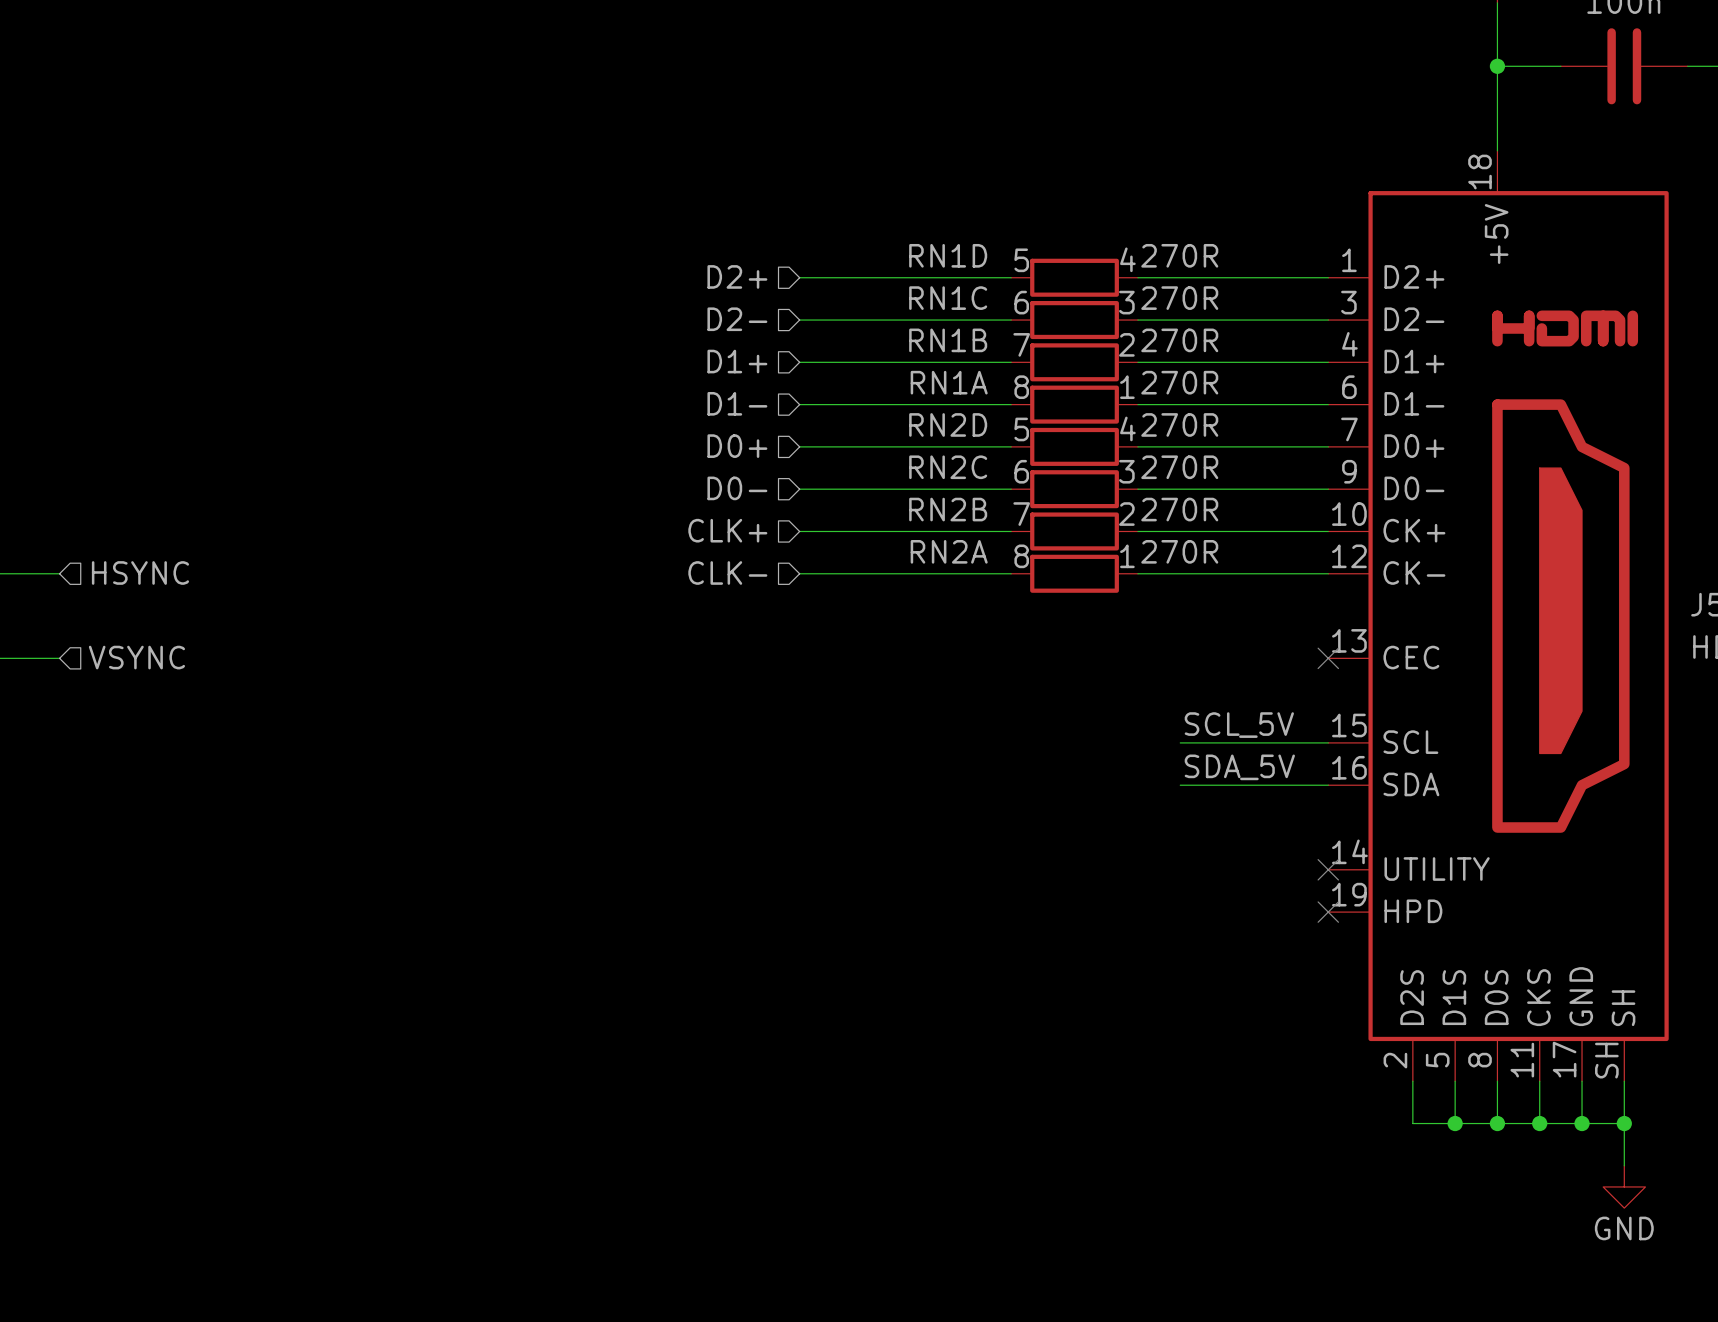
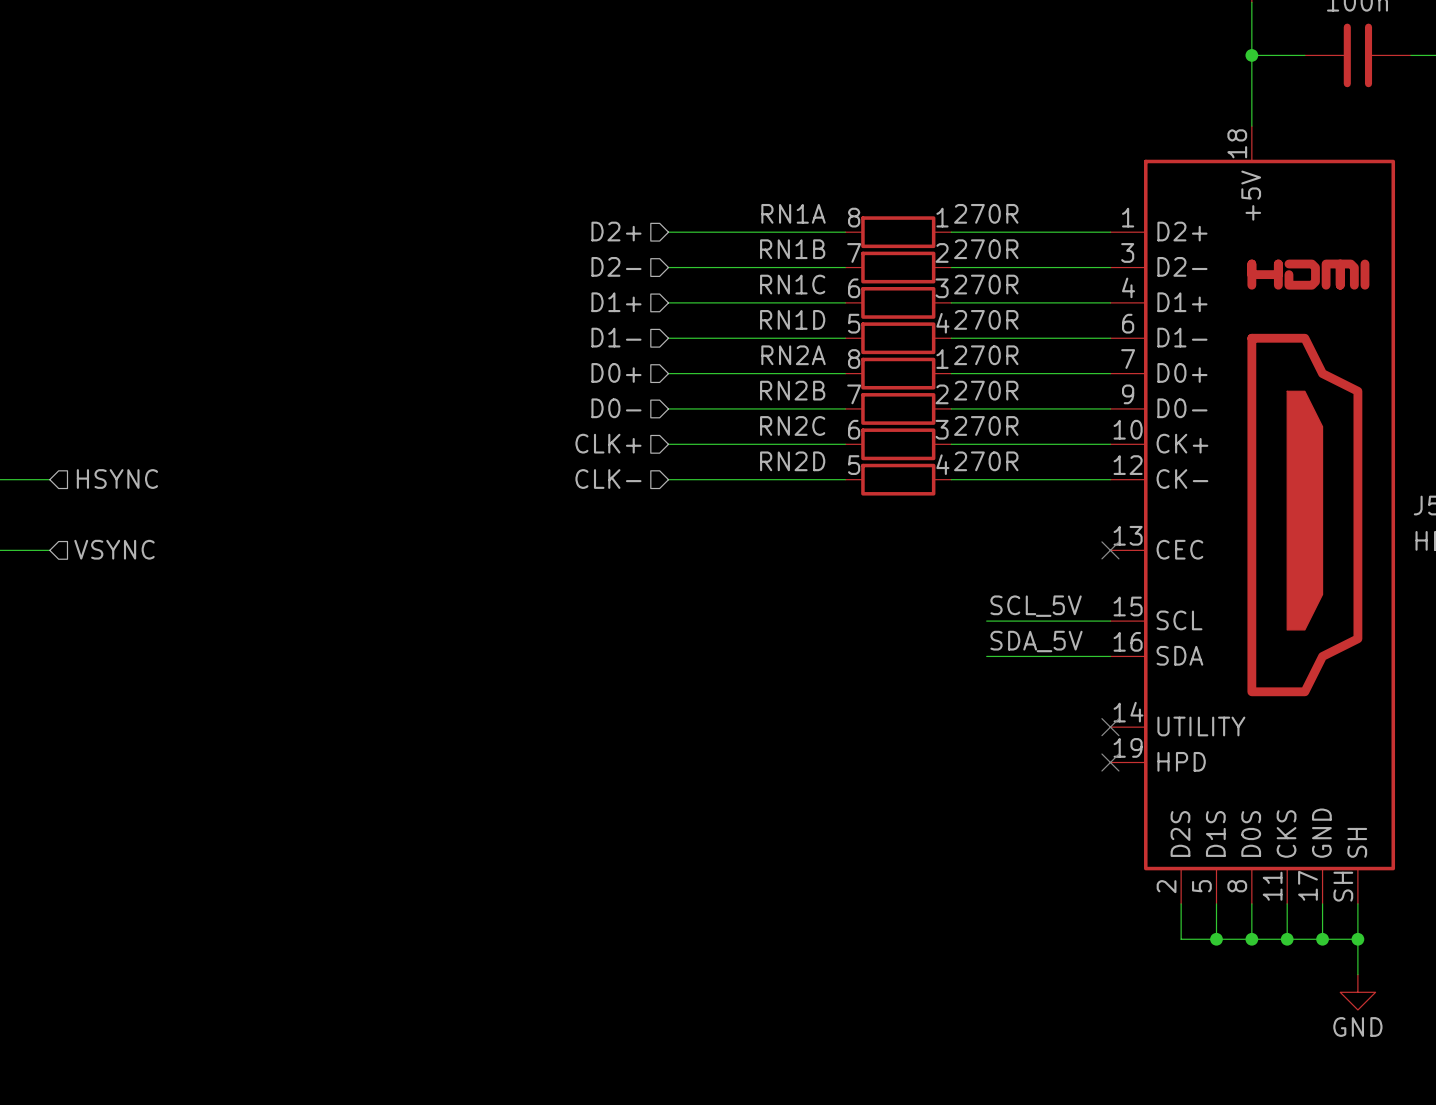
RN1D position: (1074, 277) -> (898, 338)
RN1C position: (1074, 320) -> (898, 302)
RN1B position: (1074, 362) -> (898, 267)
RN1A position: (1074, 404) -> (898, 232)
RN2D position: (1074, 446) -> (898, 479)
RN2C position: (1074, 489) -> (898, 444)
RN2B position: (1074, 531) -> (898, 408)
RN2A position: (1074, 573) -> (898, 373)

